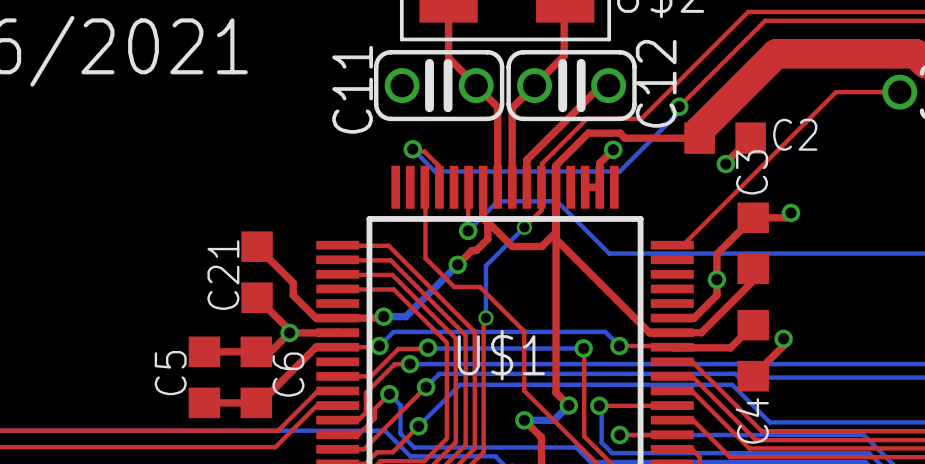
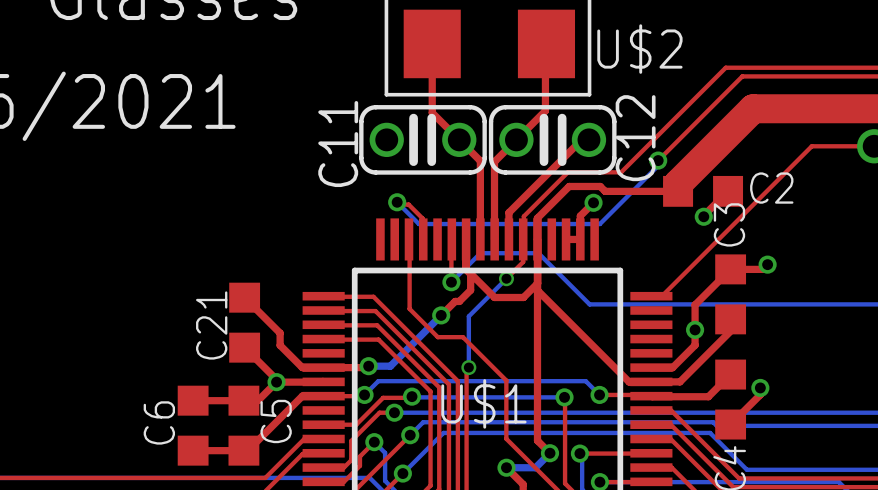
C5 name: C5 (170, 373) -> C6 (159, 422)
C6 name: C6 (288, 374) -> C5 (276, 421)

